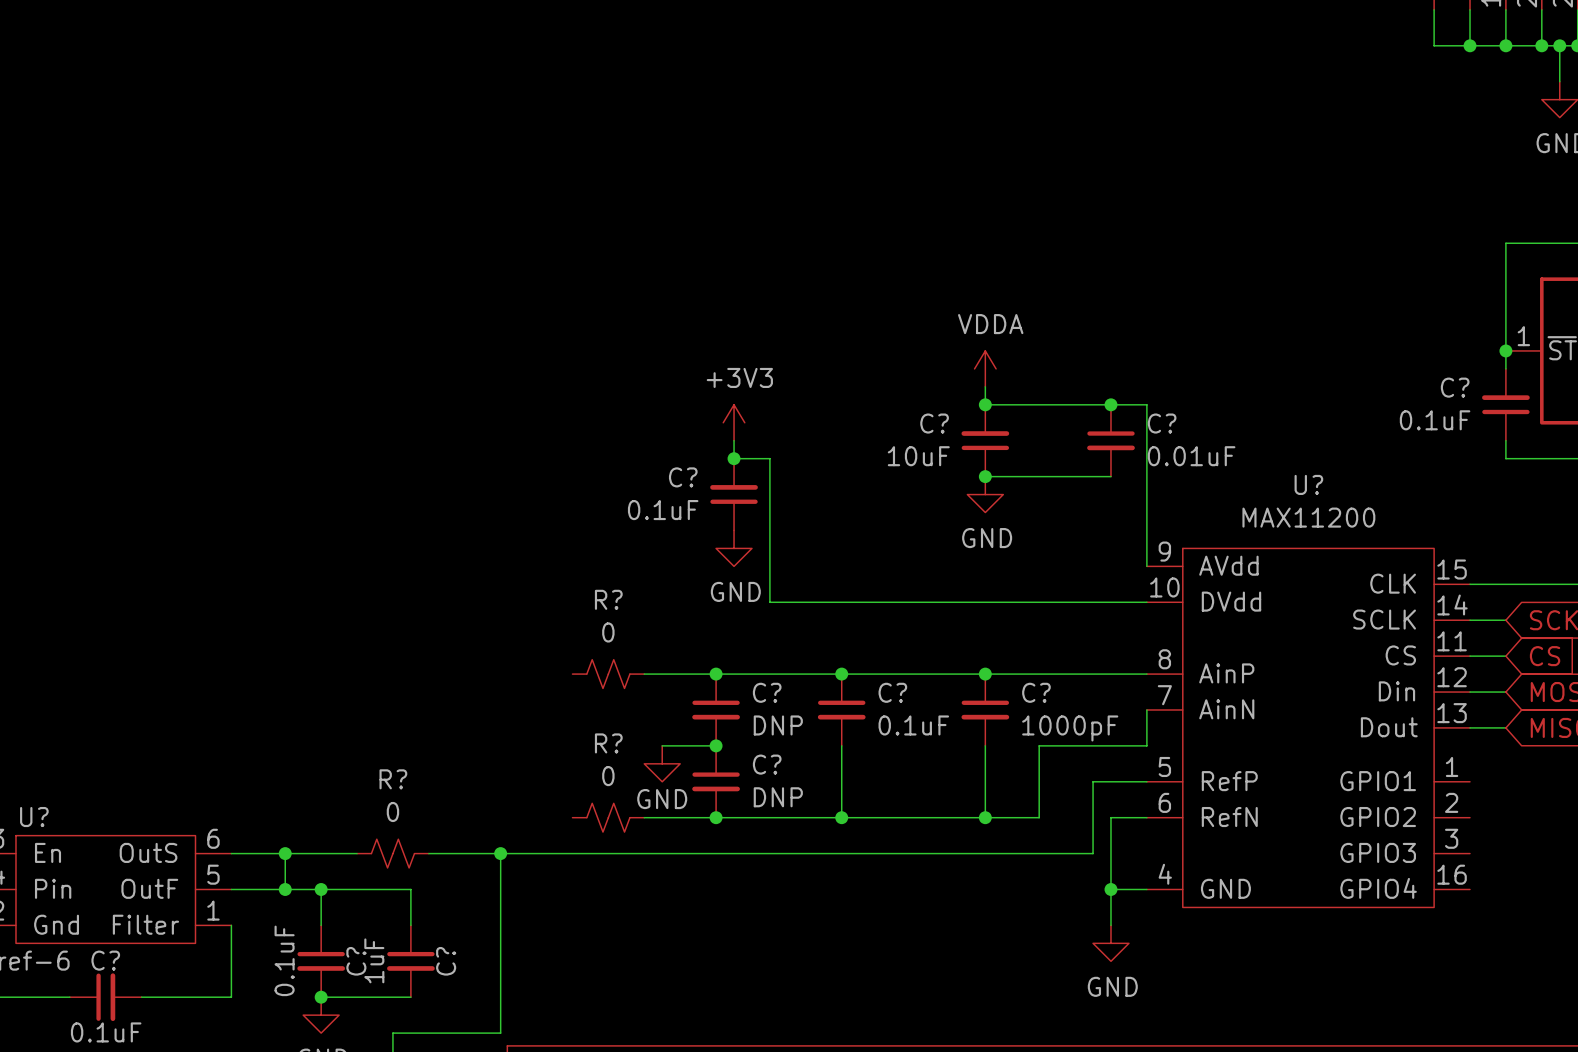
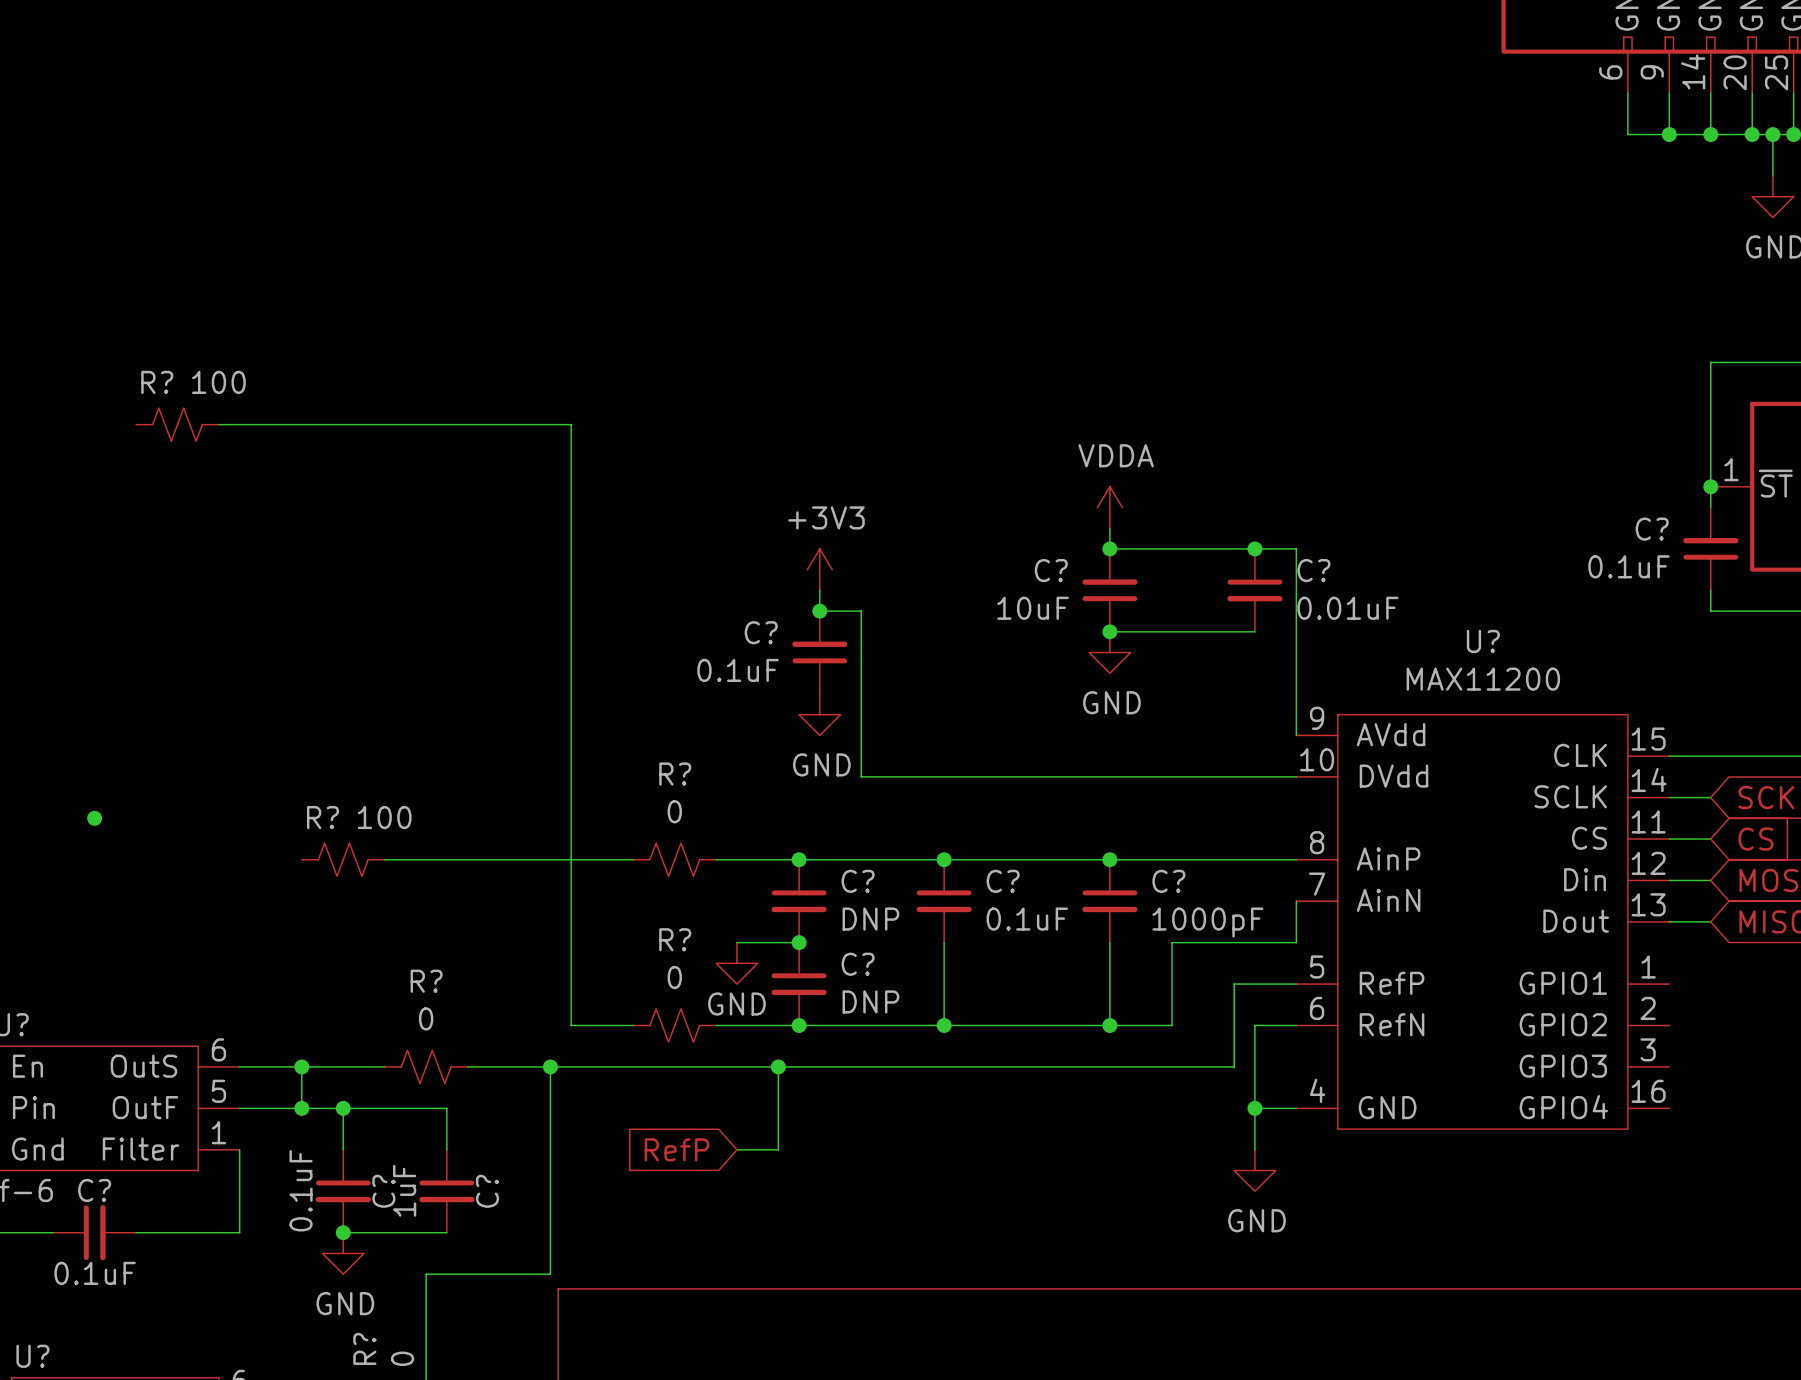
R?: none -> 100 (177, 424)
wire: none -> (218, 424) (571, 424) (571, 1025) (633, 1025)
junction: none -> (94, 818)
R?: none -> 100 (343, 859)
wire: none -> (384, 859) (633, 859)
wire: none -> (778, 1066) (778, 1149) (736, 1149)
junction: none -> (778, 1066)
global label: none -> RefP (676, 1149)

